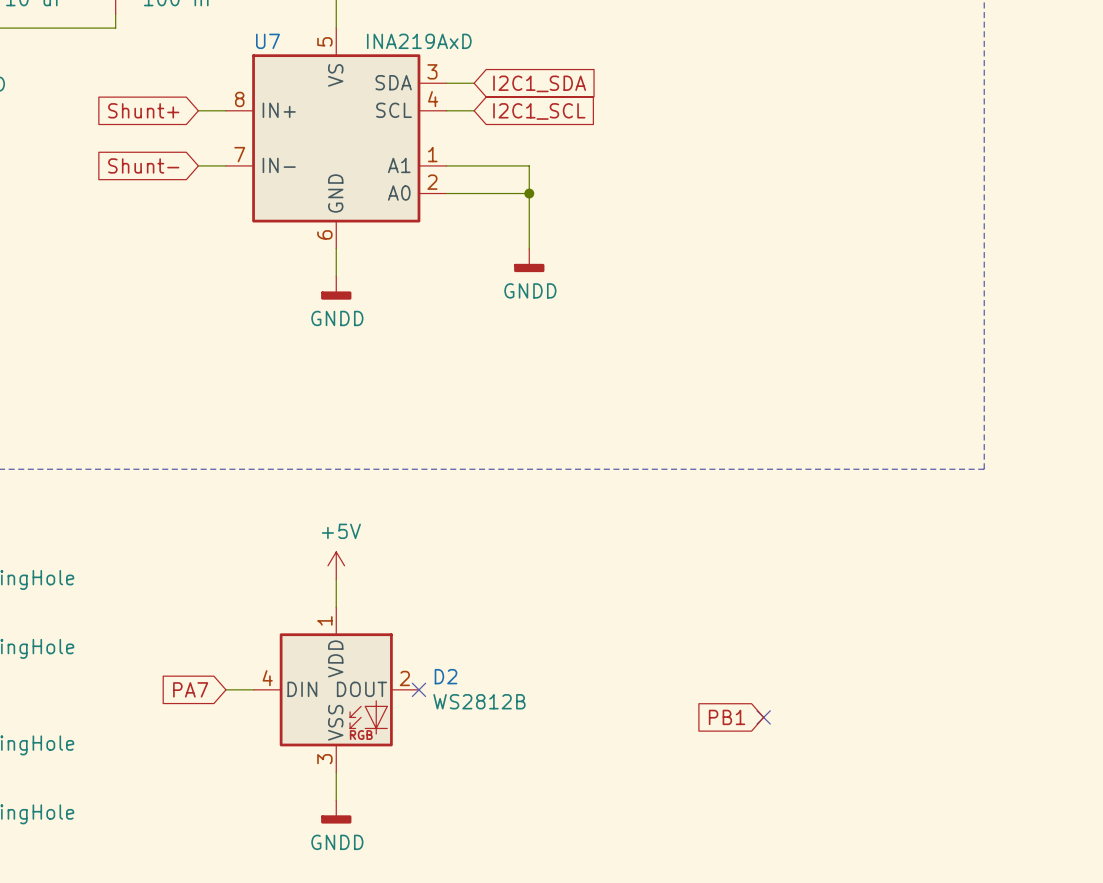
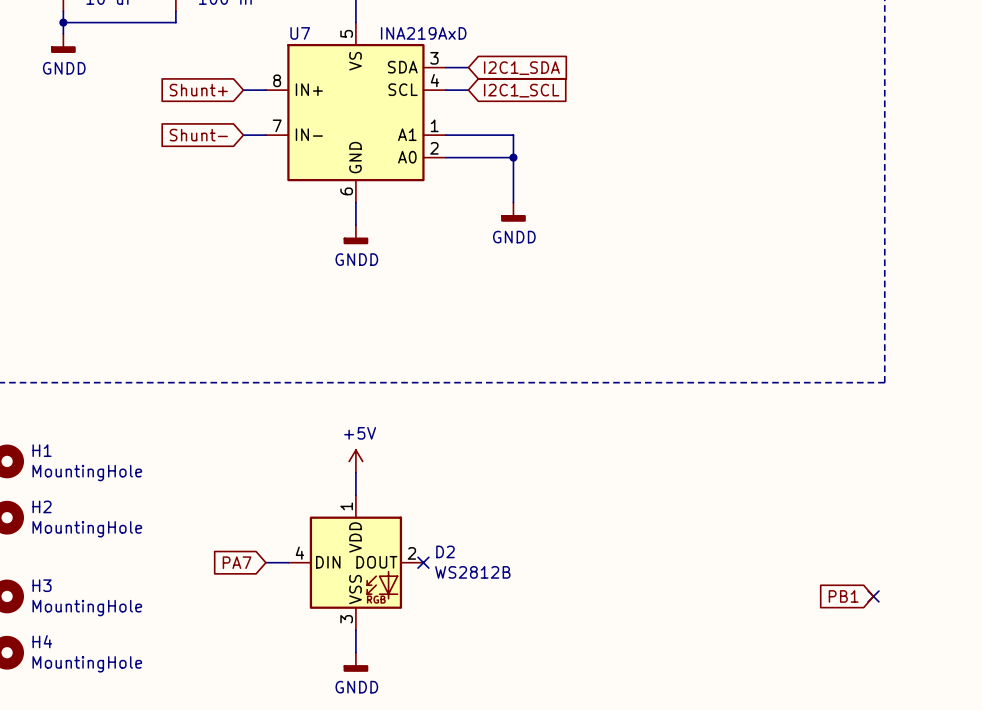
global label position: PB1 (727, 717) -> PB1 (843, 596)
no-connect mark: (763, 717) -> none
no-connect mark: none -> (873, 596)

